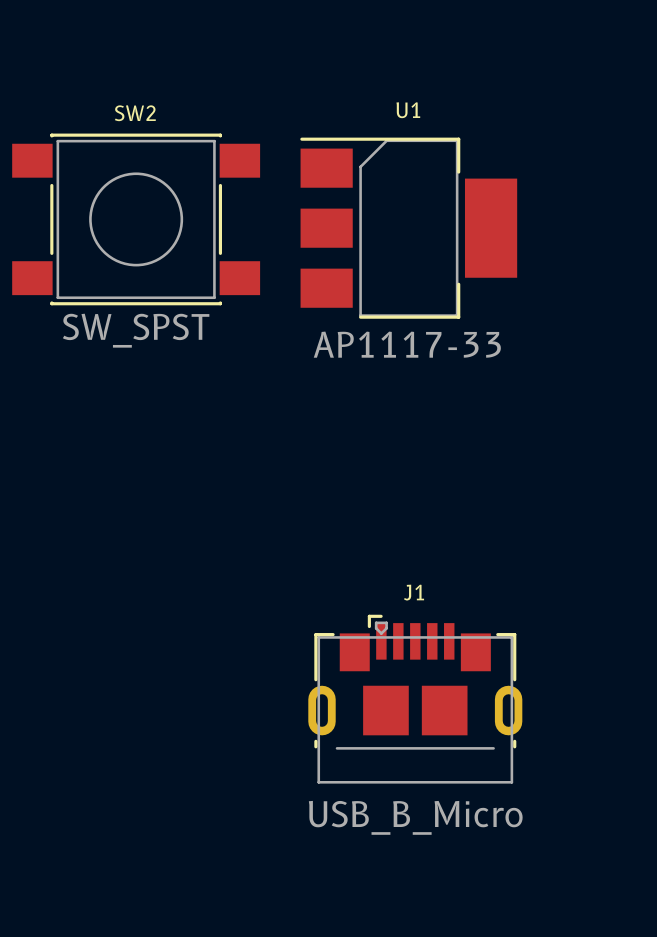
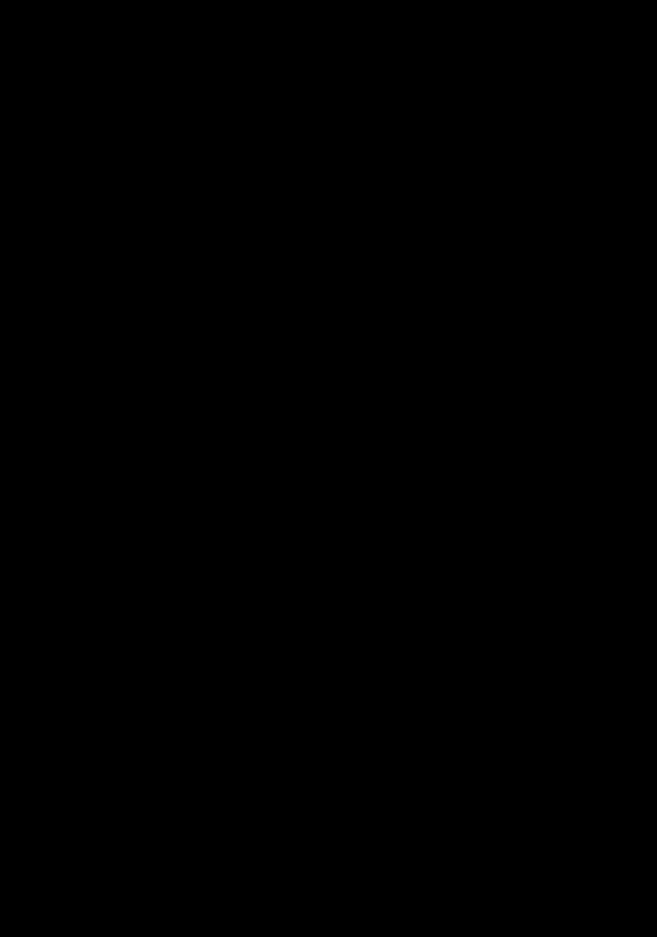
SW2: SW_SPST (136, 219) -> none
U1: AP1117-33 (408, 228) -> none
J1: USB_B_Micro (415, 699) -> none

